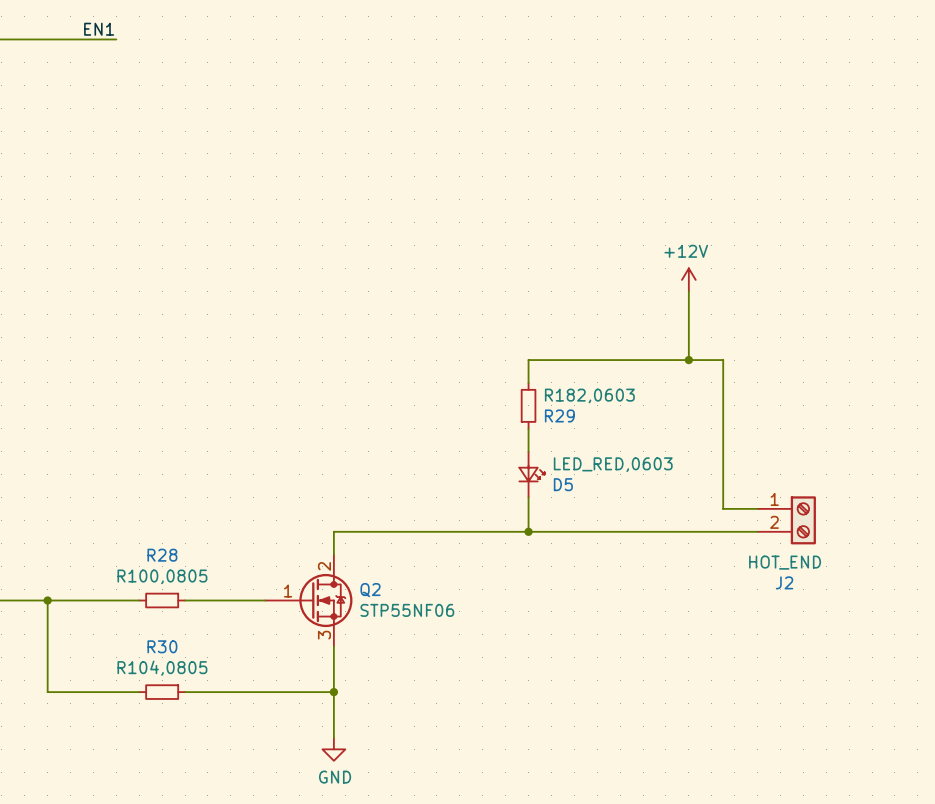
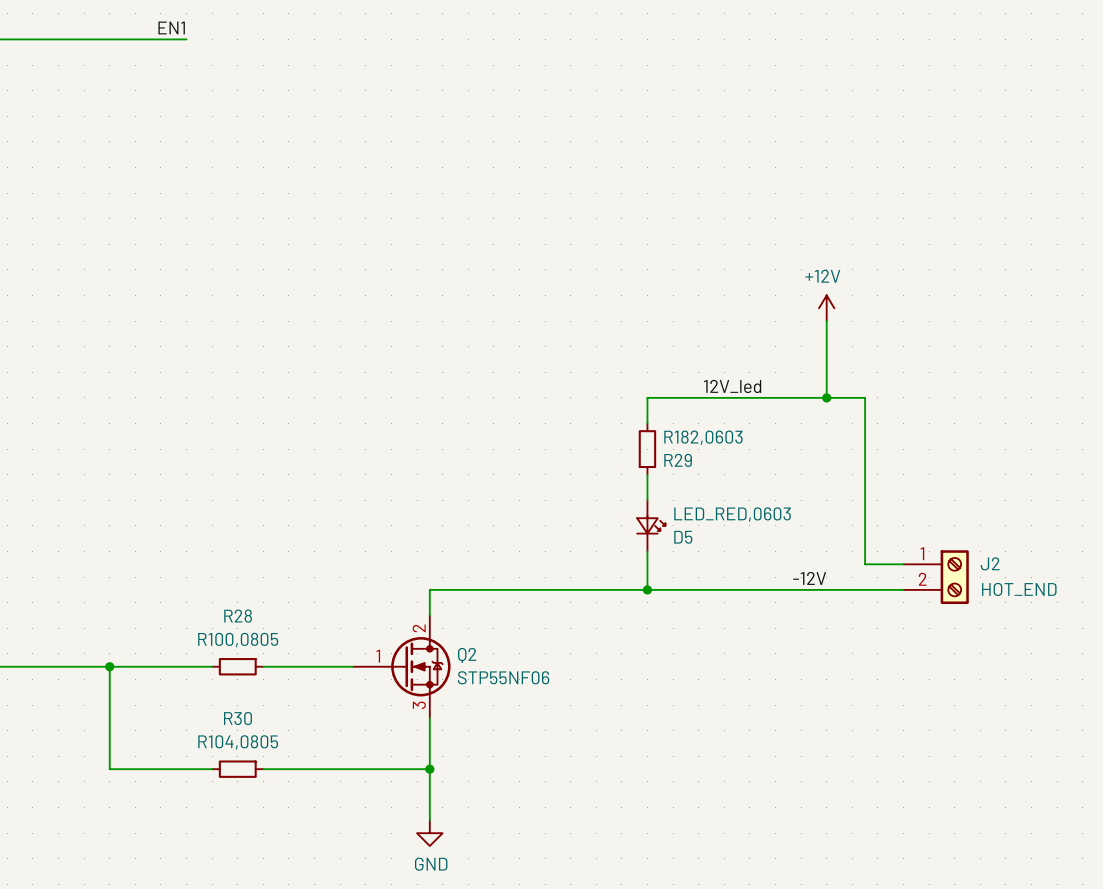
label: none -> 12V_led (732, 386)
label: none -> -12V (809, 578)
J2 value position: HOT_END (785, 562) -> HOT_END (1019, 589)
J2 name position: J2 (784, 582) -> J2 (990, 563)

